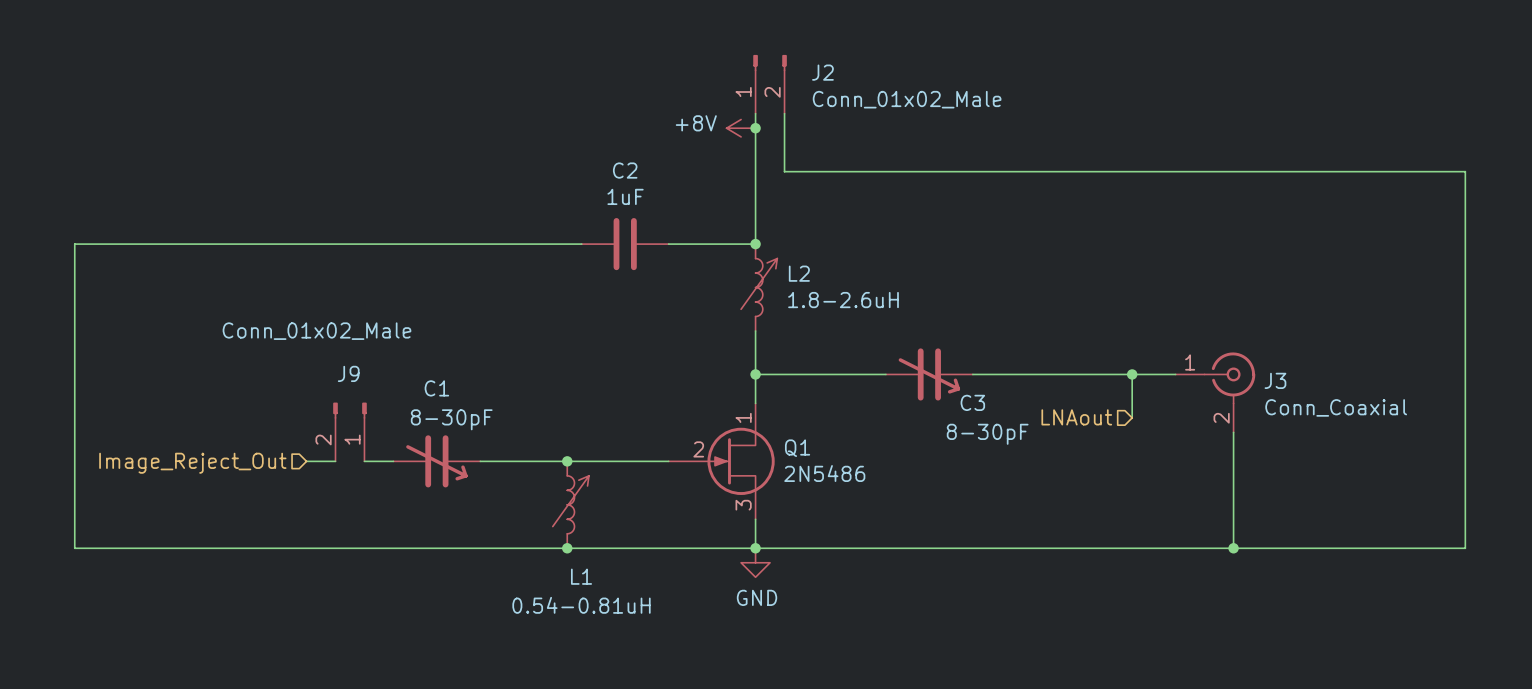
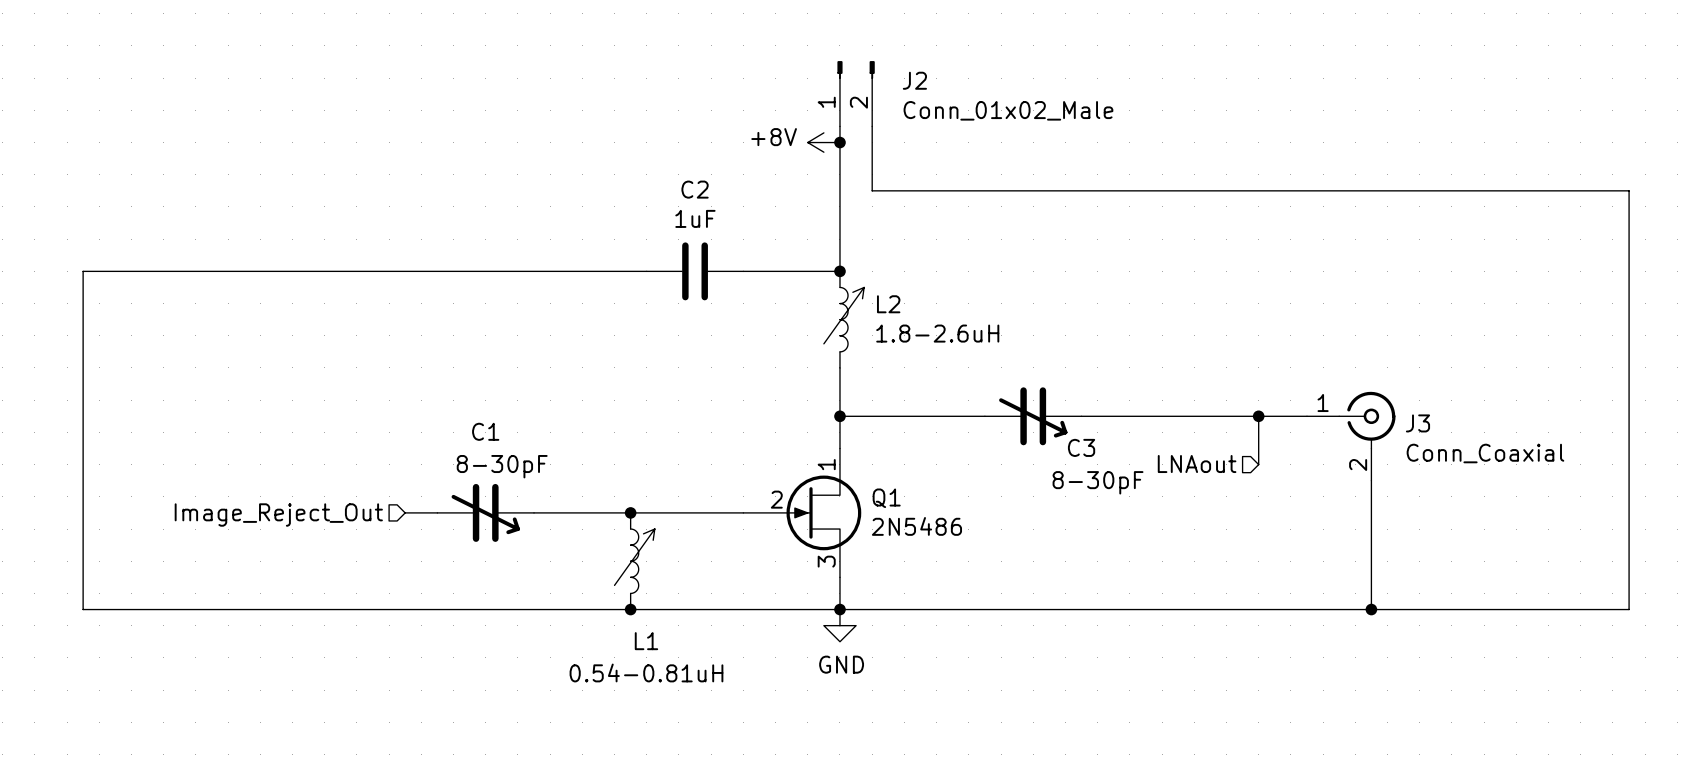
J9: Conn_01x02_Male (349, 431) -> none
wire: (306, 461) (335, 461) -> none
hierarchical label position: Image_Reject_Out (192, 463) -> Image_Reject_Out (278, 515)

